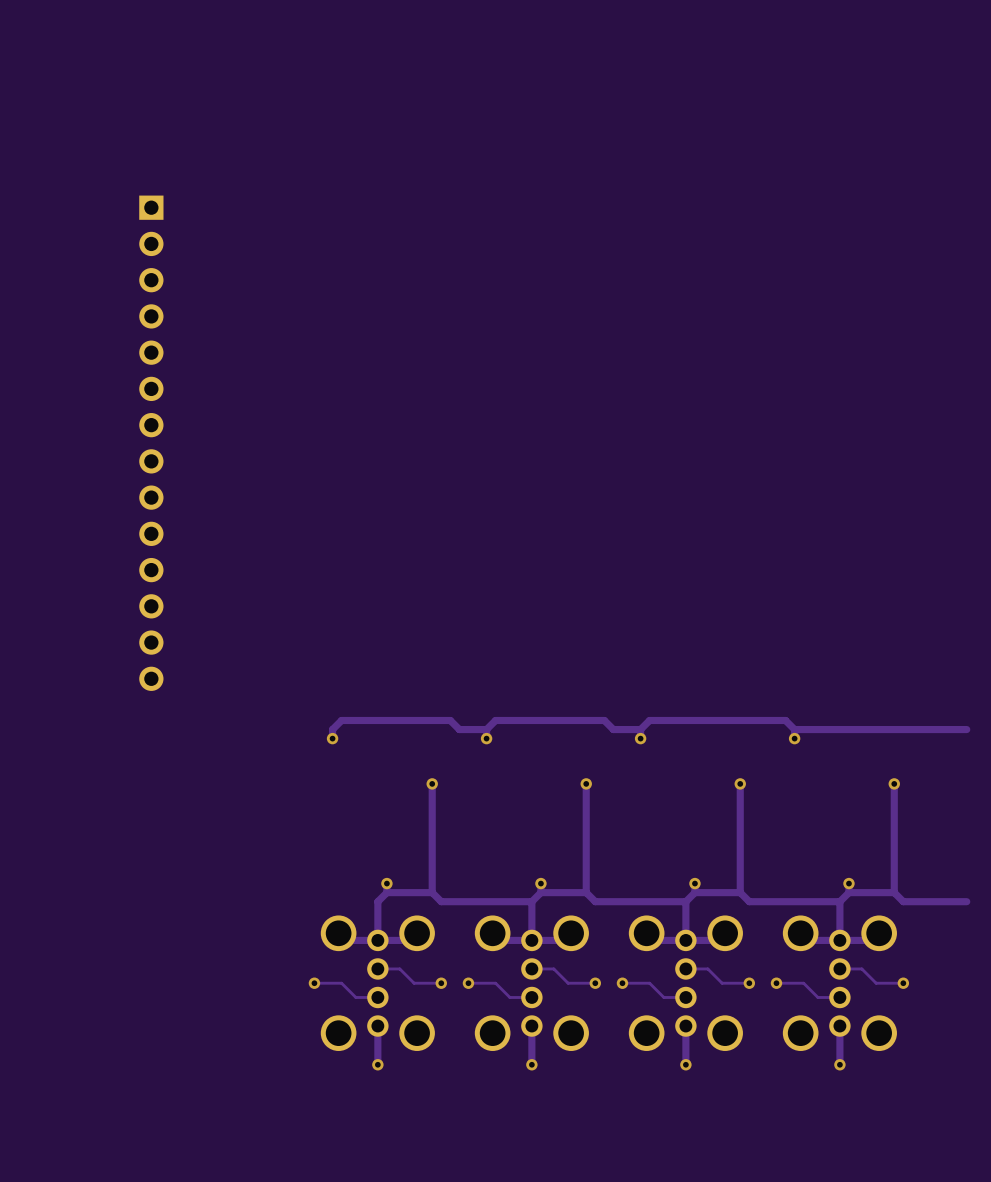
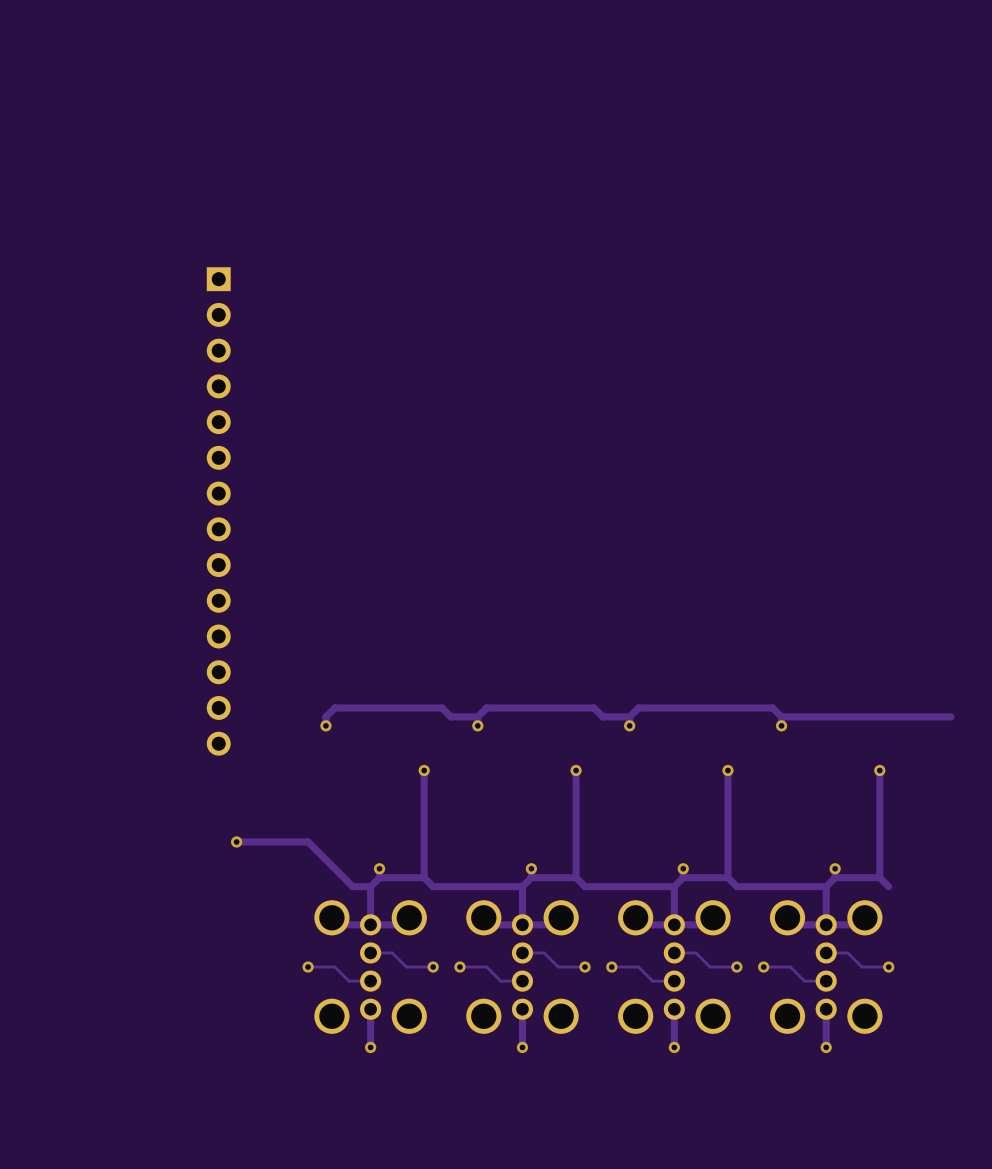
part position: (151, 443) -> (218, 511)
track: none -> (236, 841) (308, 841) (352, 886) (370, 886)
via: none -> (236, 841)
track: (966, 901) (903, 901) -> none

